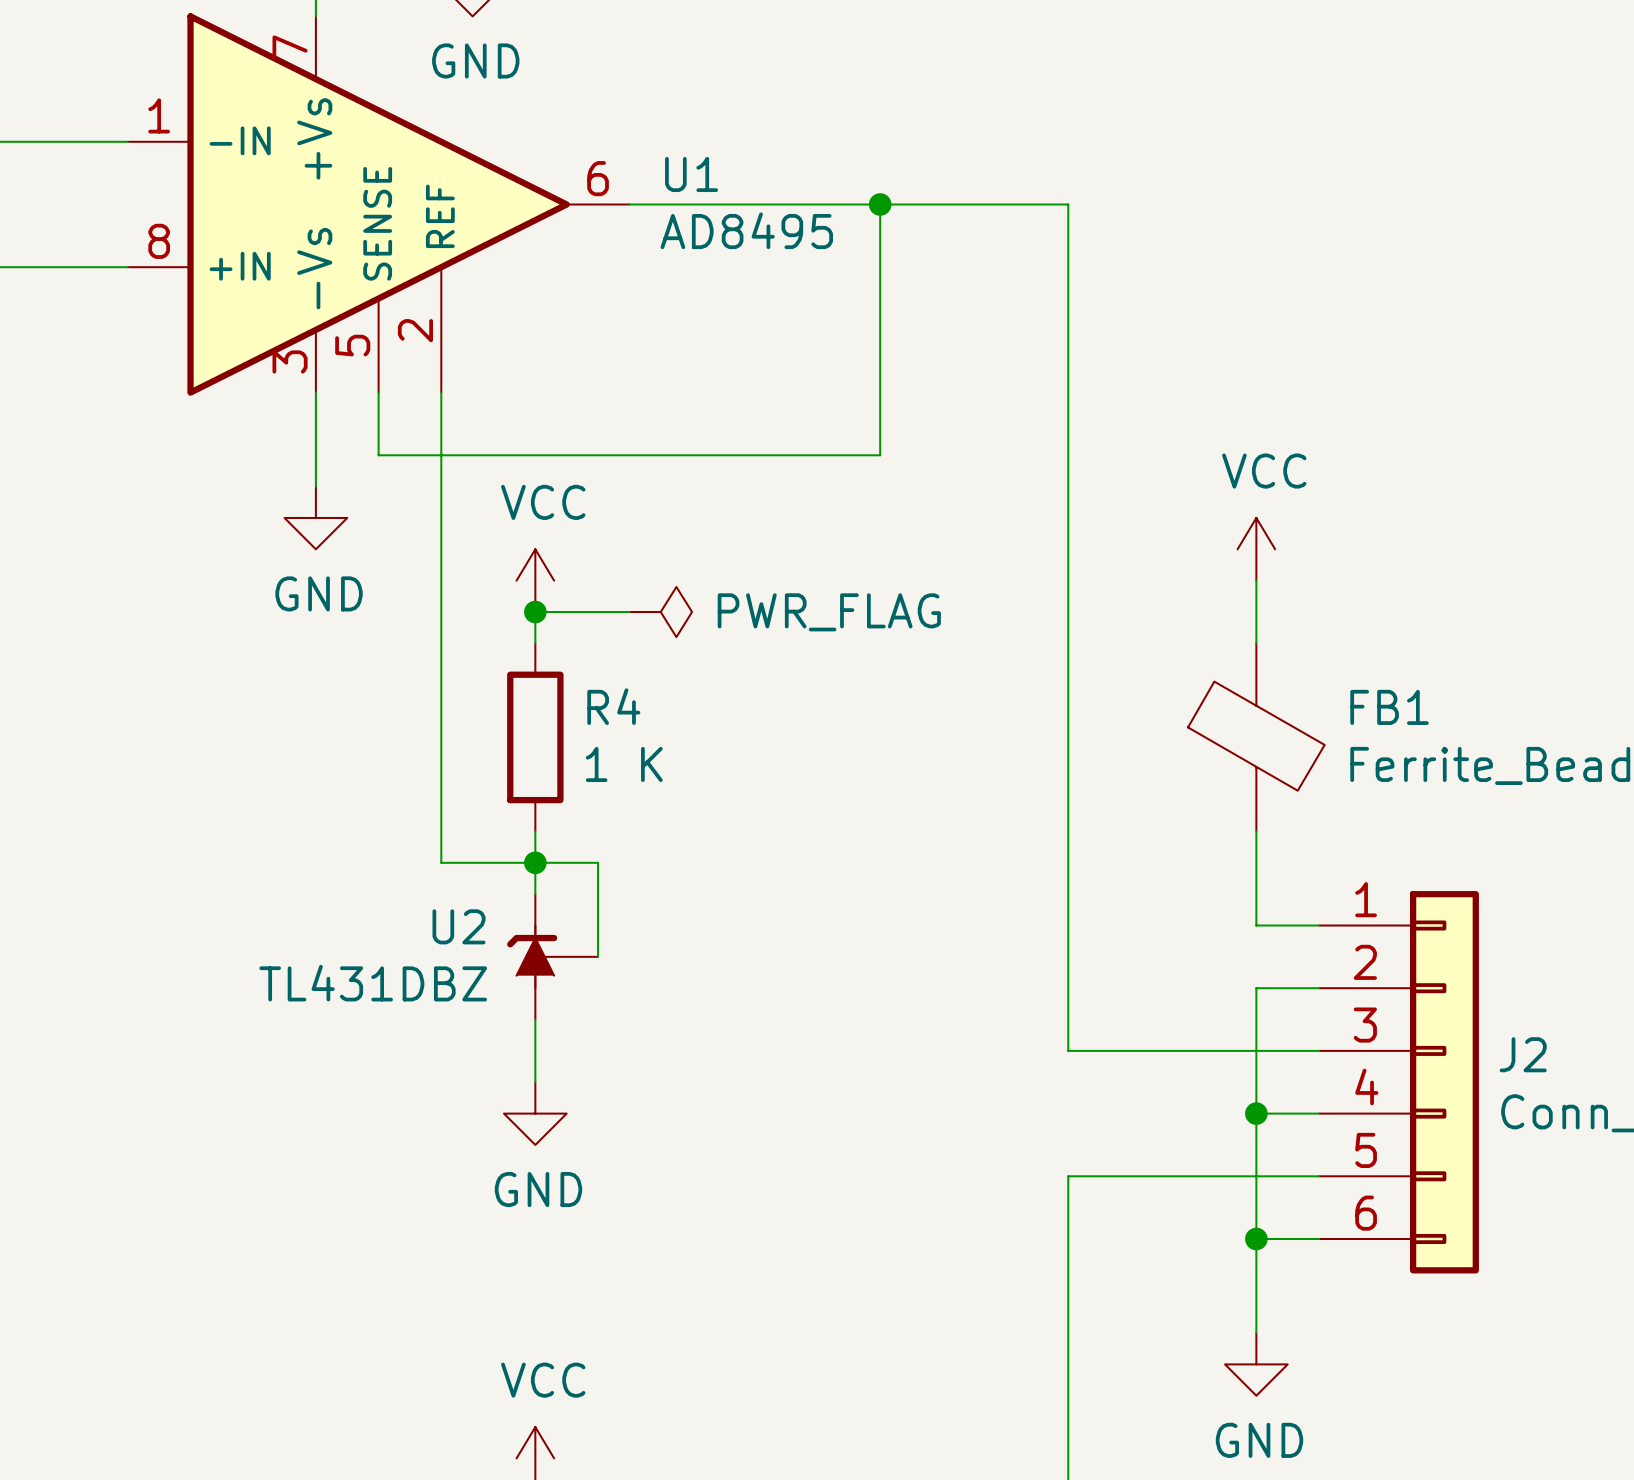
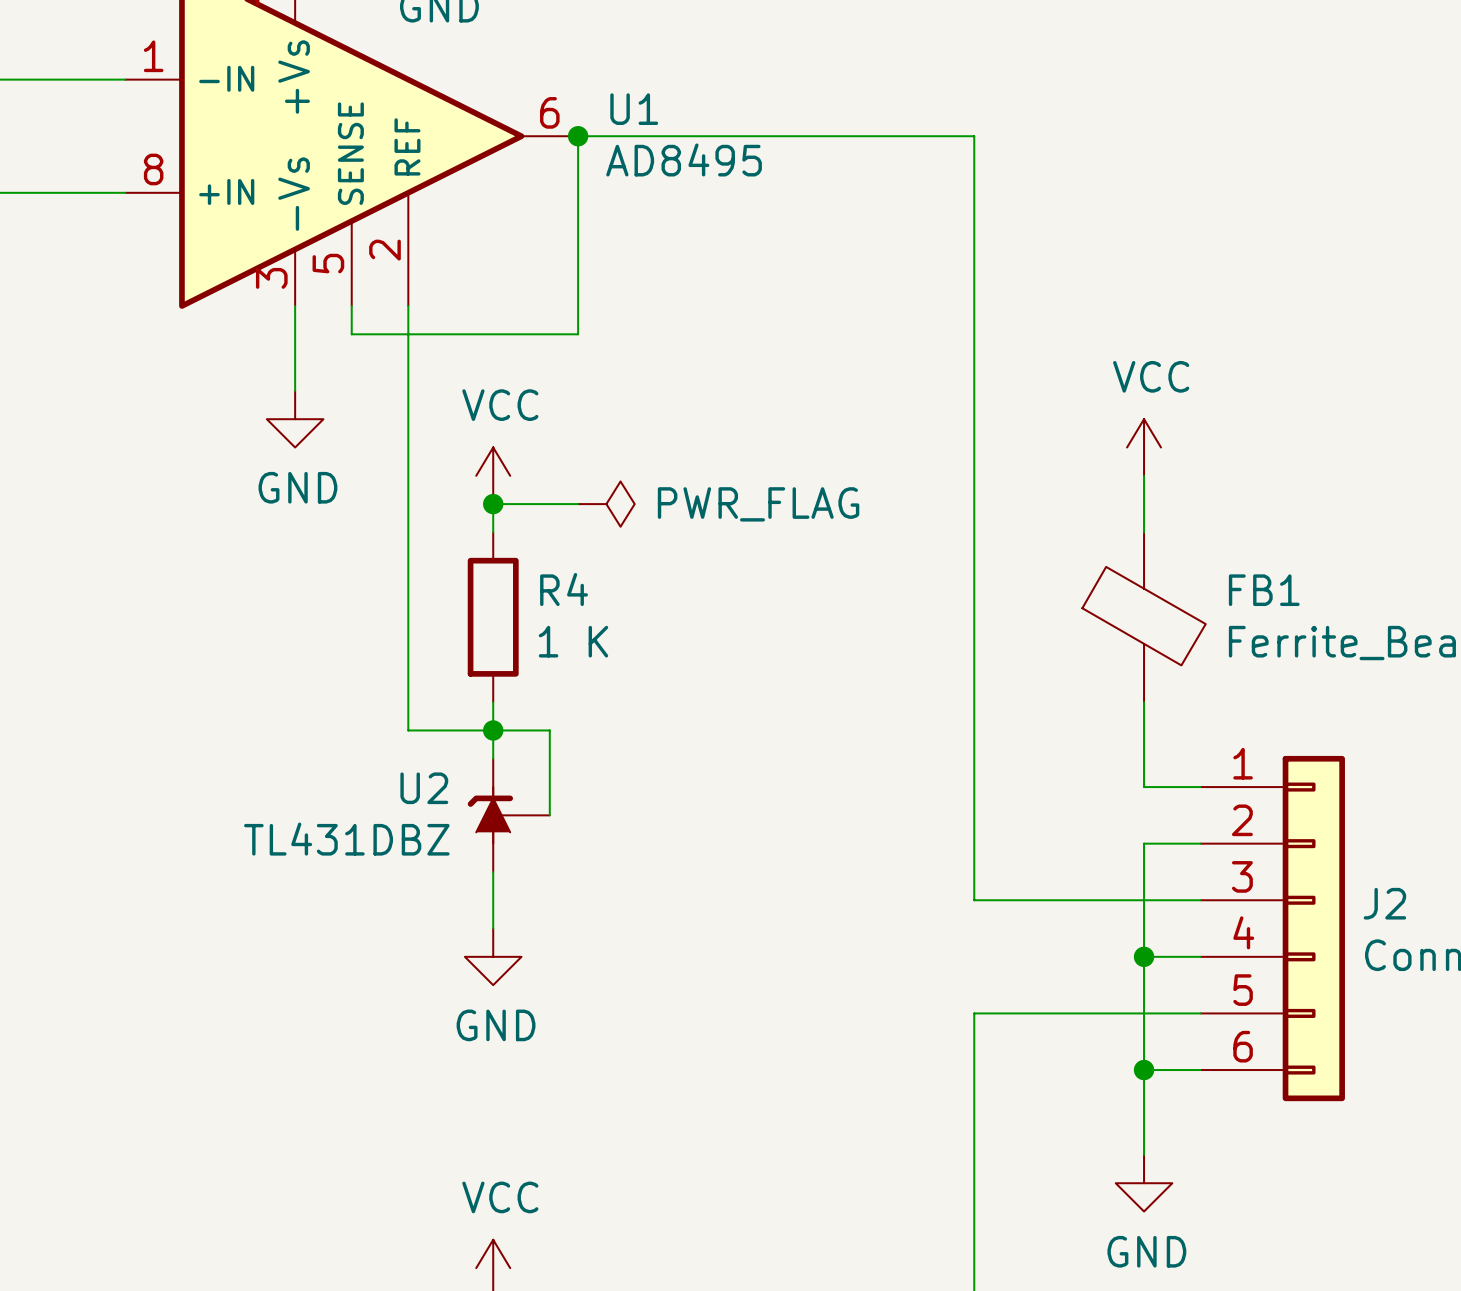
junction: none -> (578, 136)
wire: (880, 204) (880, 455) (378, 455) (378, 423) -> (578, 136) (578, 334) (351, 334)
junction: (880, 204) -> none

